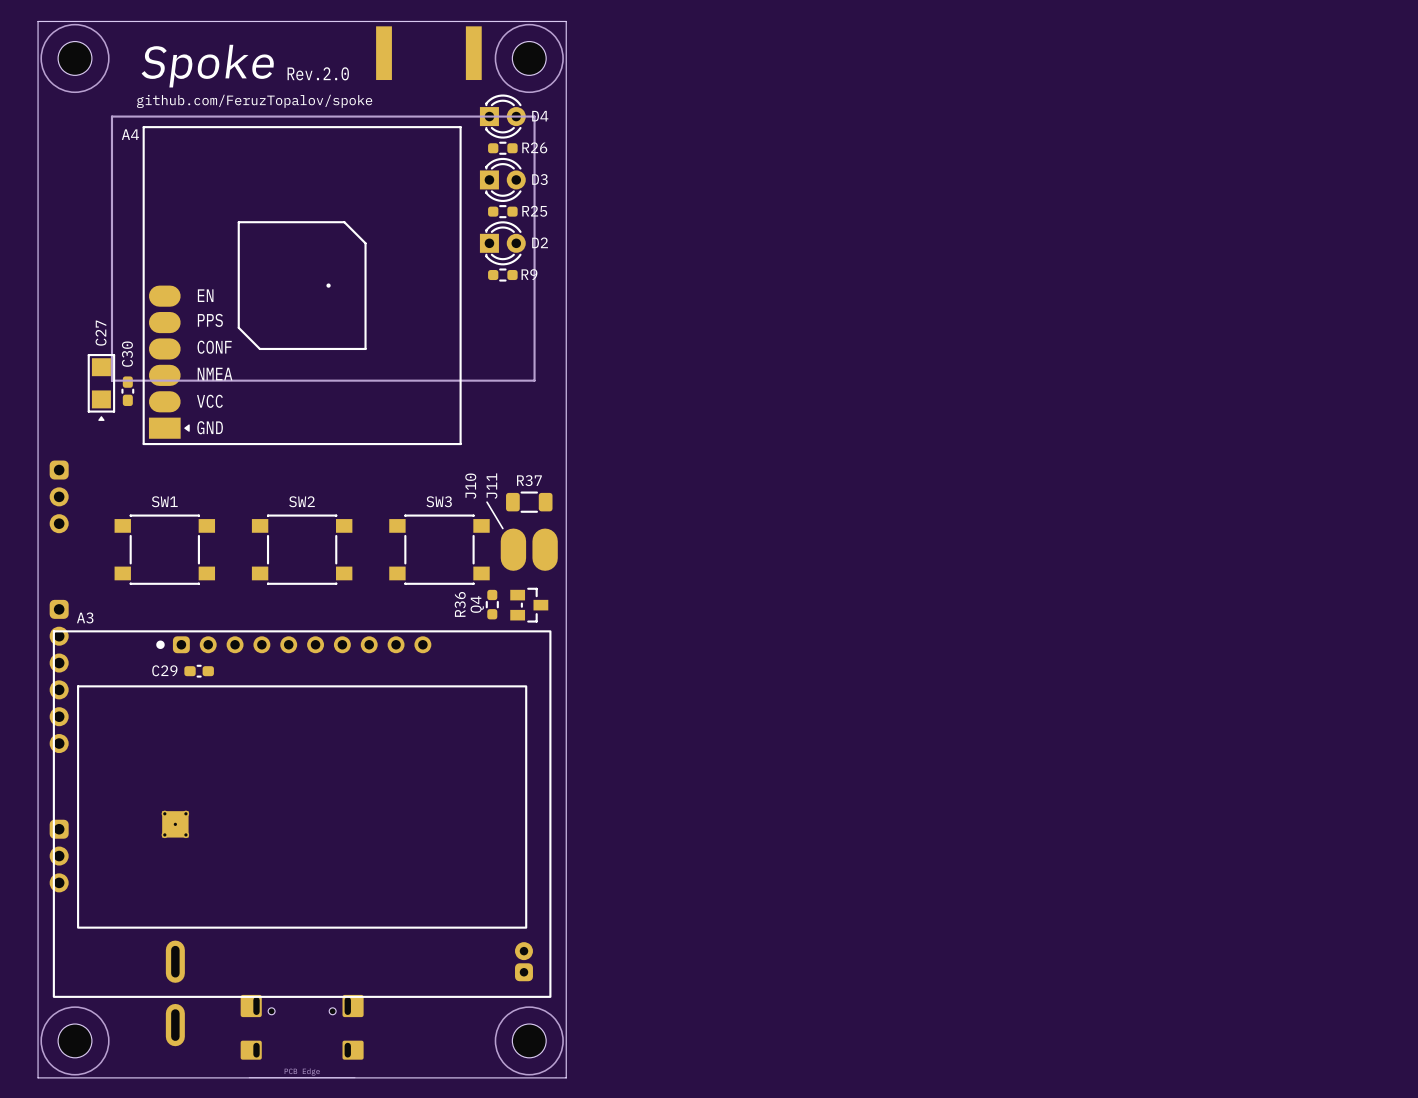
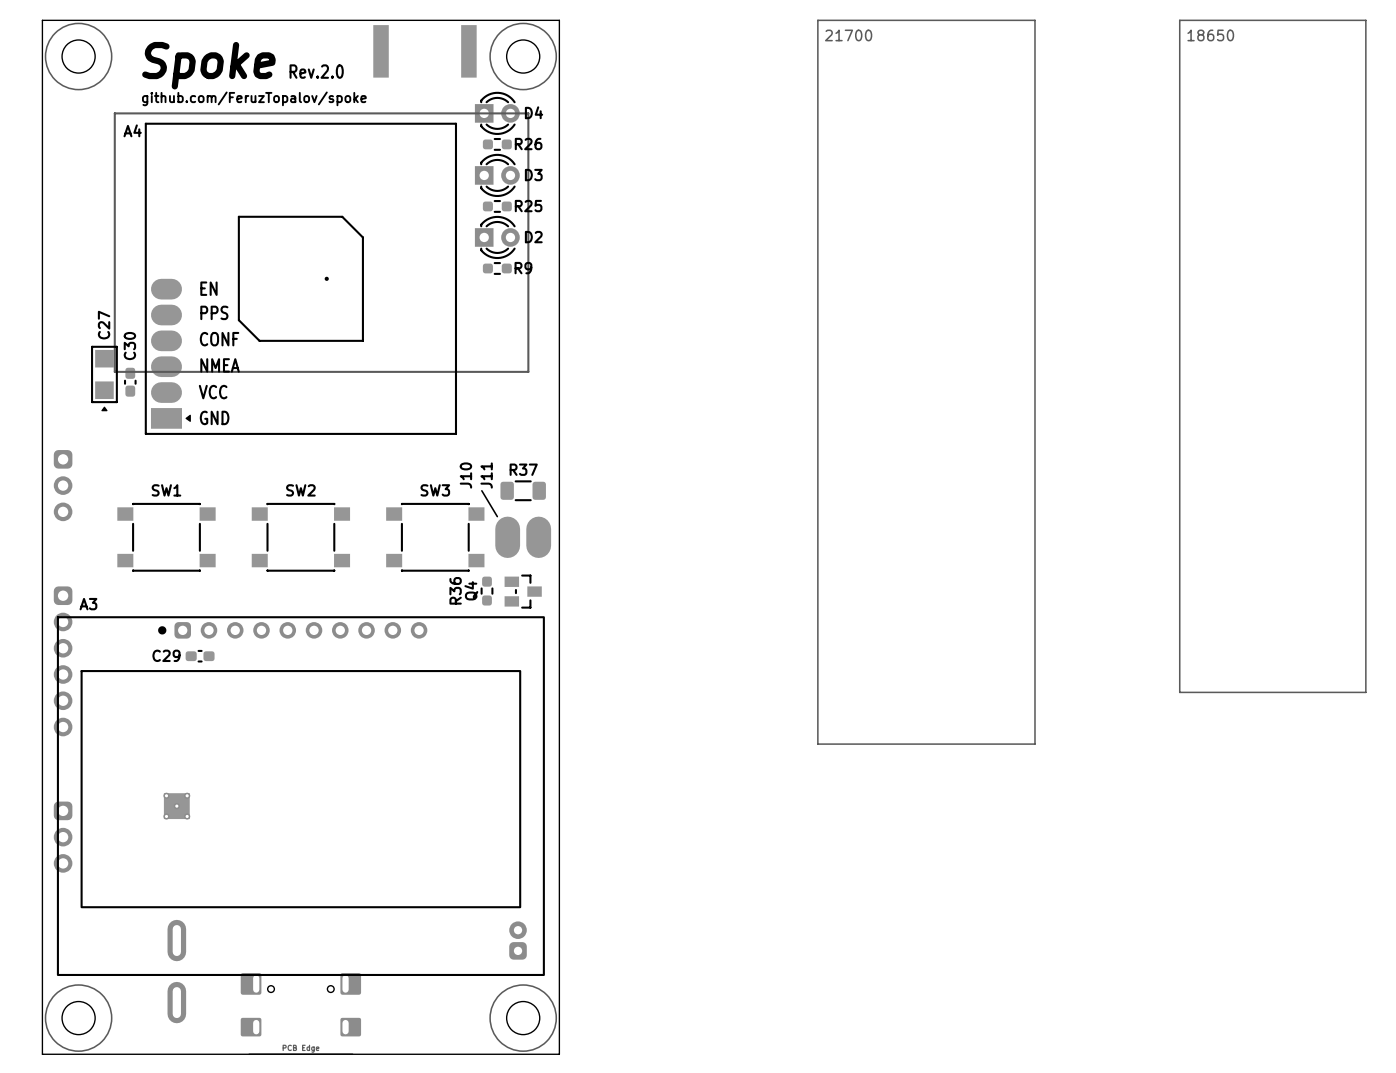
line: none -> (817, 20) (1034, 20) (1034, 744) (817, 744) (817, 20)
line: none -> (1179, 20) (1365, 20) (1365, 692) (1179, 692) (1179, 20)
text: none -> 21700 (848, 35)
text: none -> 18650 (1210, 35)

